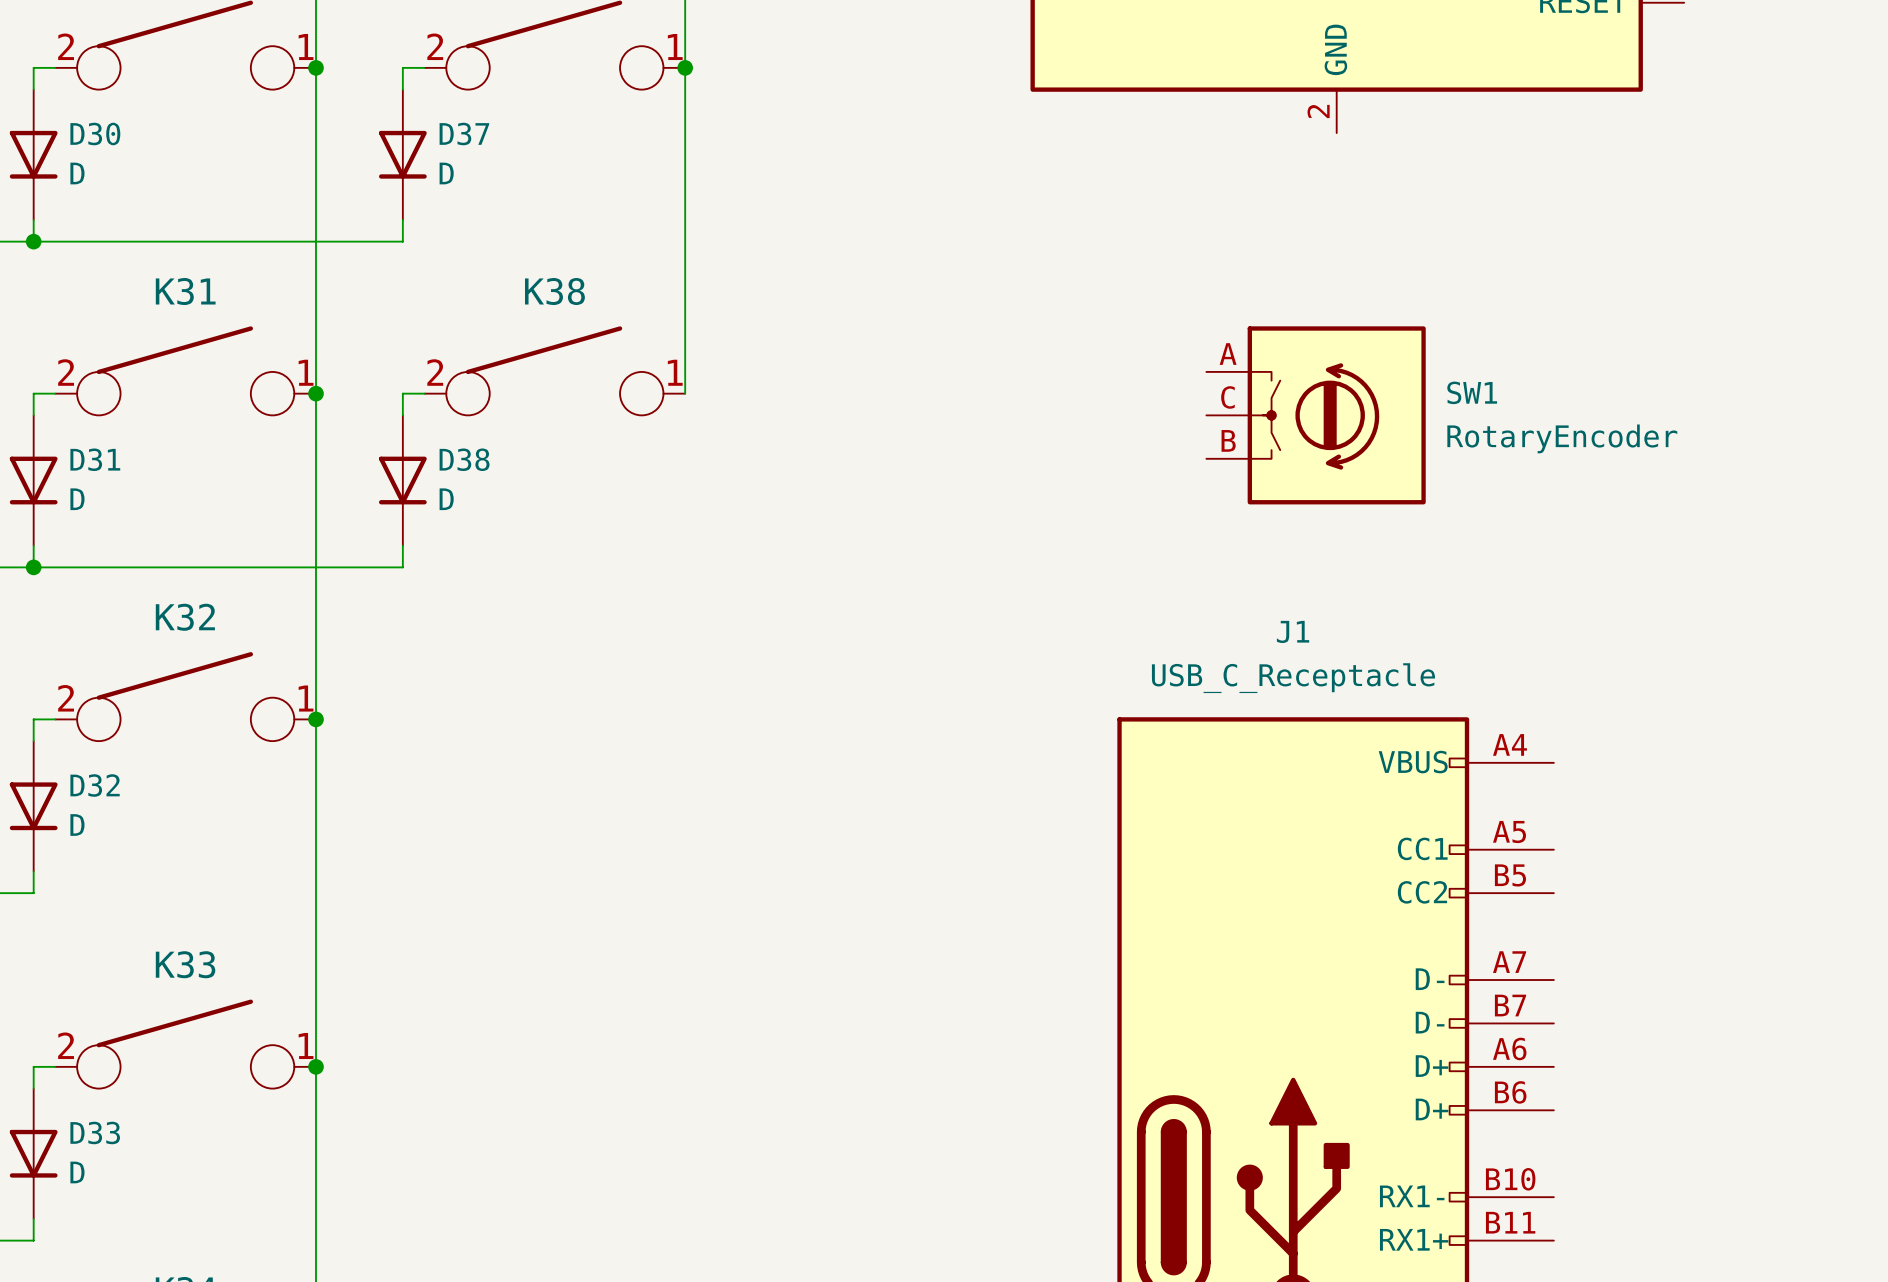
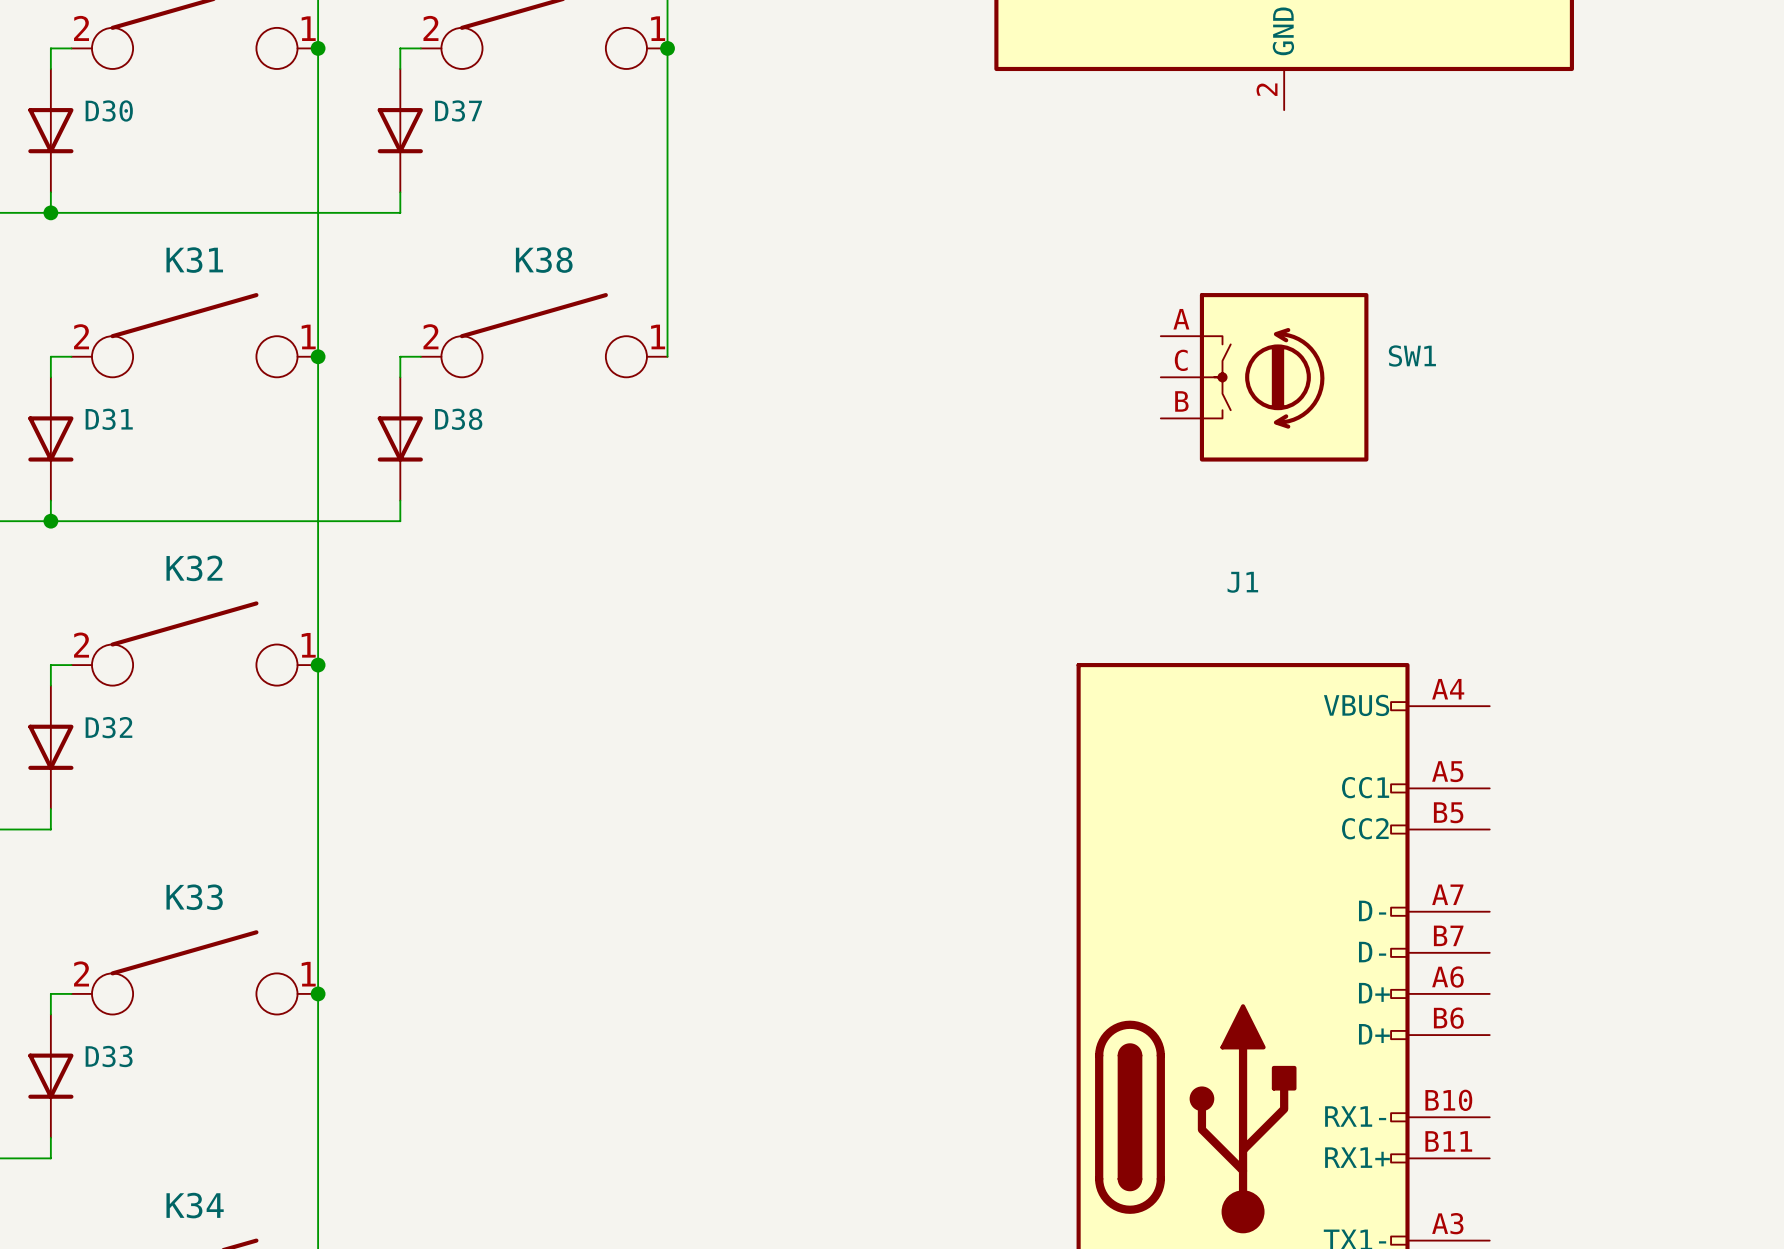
D30 value: D (77, 173) -> none
D37 value: D (446, 173) -> none
SW1 value: RotaryEncoder (1562, 438) -> none
D31 value: D (77, 499) -> none
D38 value: D (446, 499) -> none
J1 value: USB_C_Receptacle (1293, 678) -> none
D32 value: D (77, 825) -> none
D33 value: D (77, 1172) -> none

